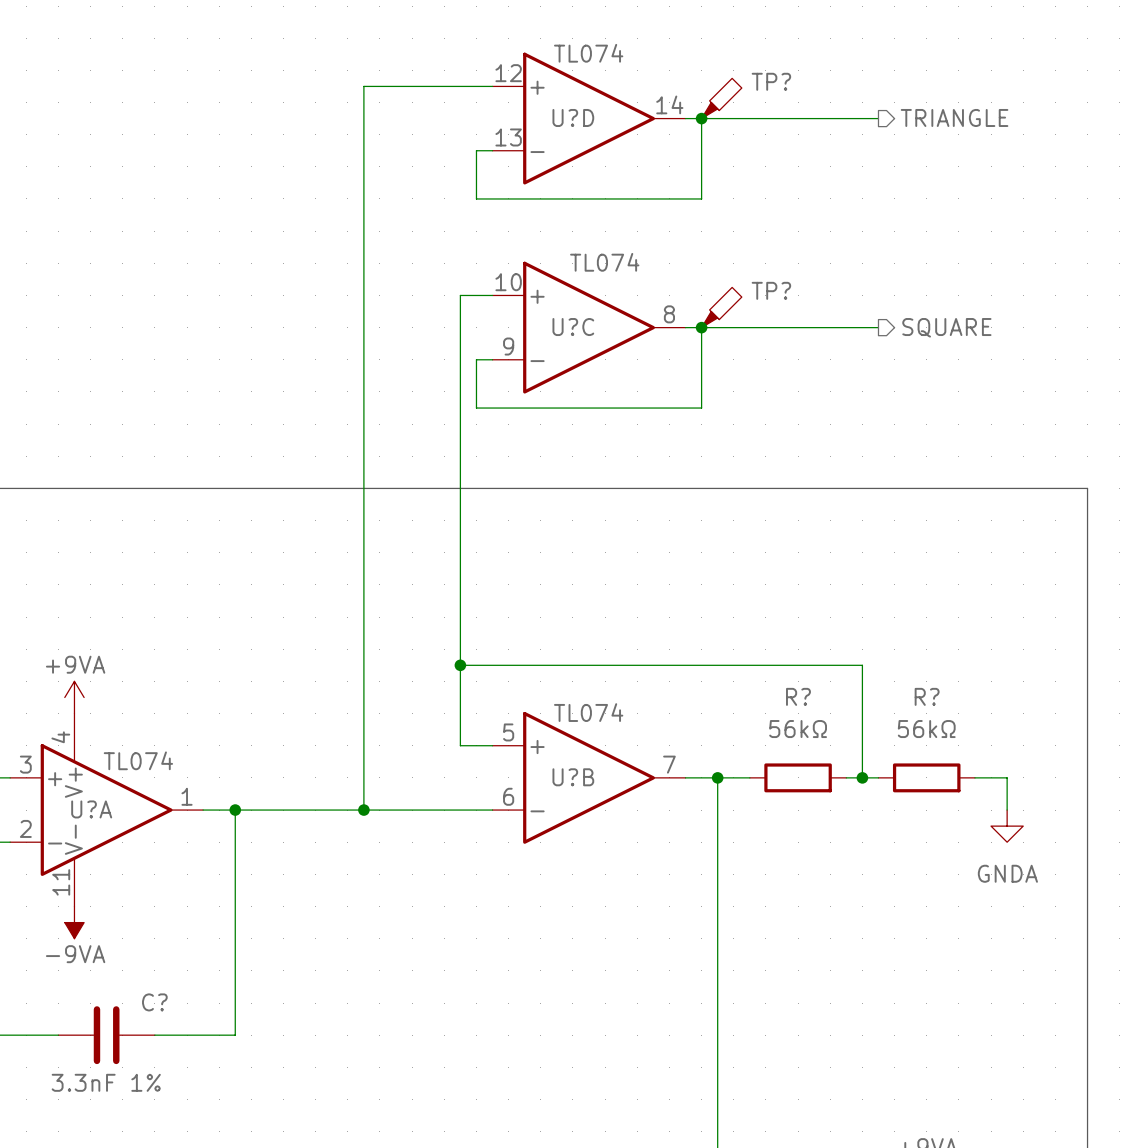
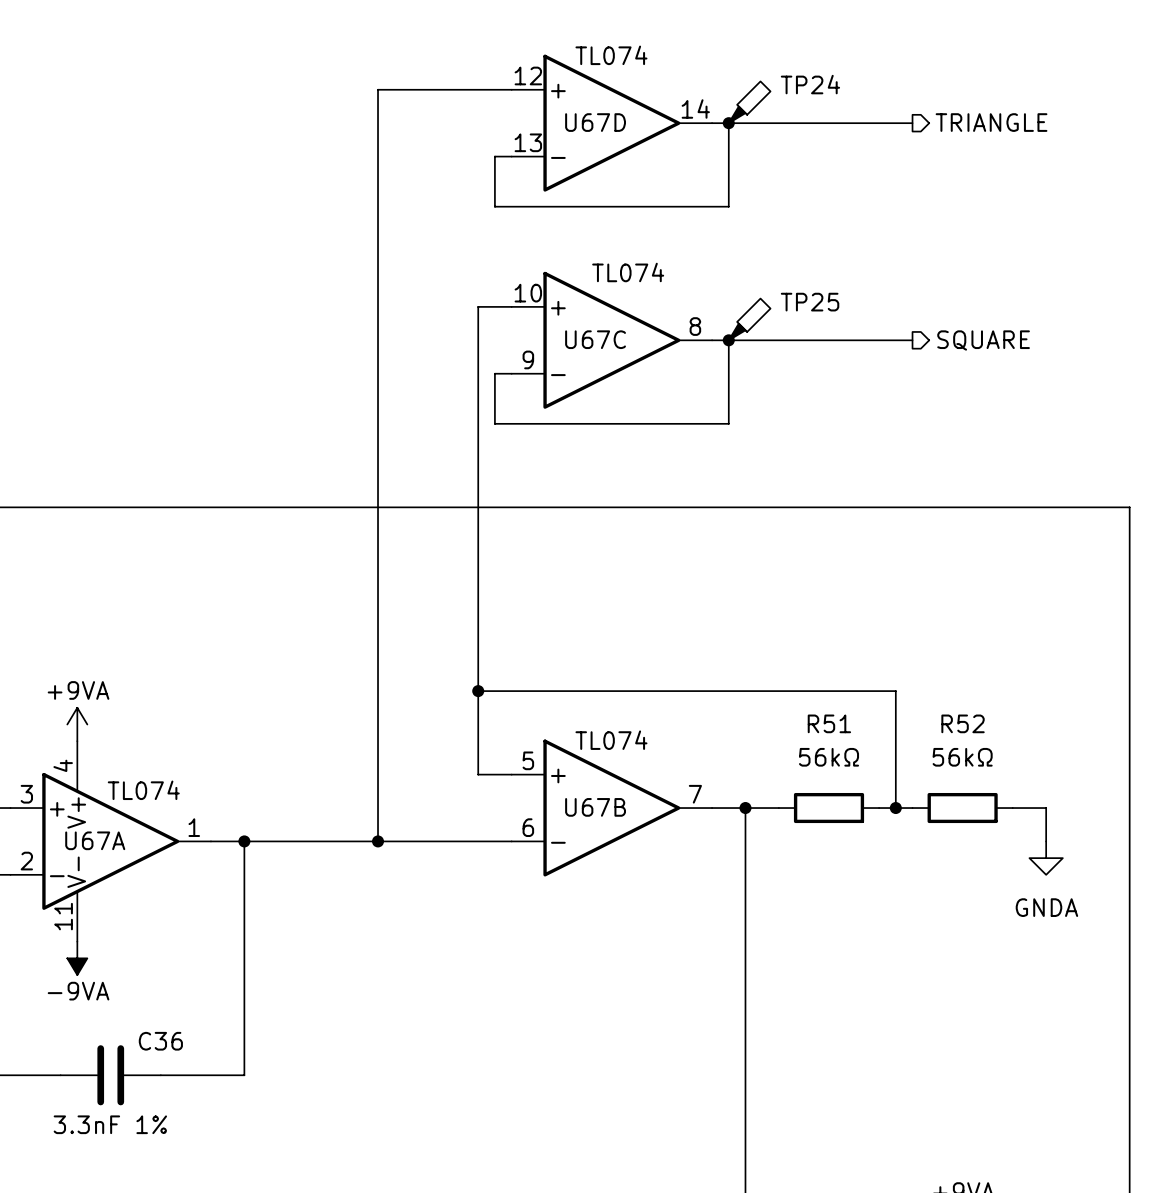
TP? name: TP? (771, 81) -> TP24 (810, 84)
U?D name: U?D (573, 117) -> U67D (595, 122)
TP? name: TP? (771, 290) -> TP25 (810, 302)
U?C name: U?C (573, 327) -> U67C (595, 339)
R? name: R? (798, 696) -> R51 (829, 723)
R? name: R? (927, 696) -> R52 (963, 723)
U?B name: U?B (573, 777) -> U67B (595, 807)
U?A name: U?A (91, 809) -> U67A (95, 840)
C? name: C? (154, 1002) -> C36 (160, 1041)

